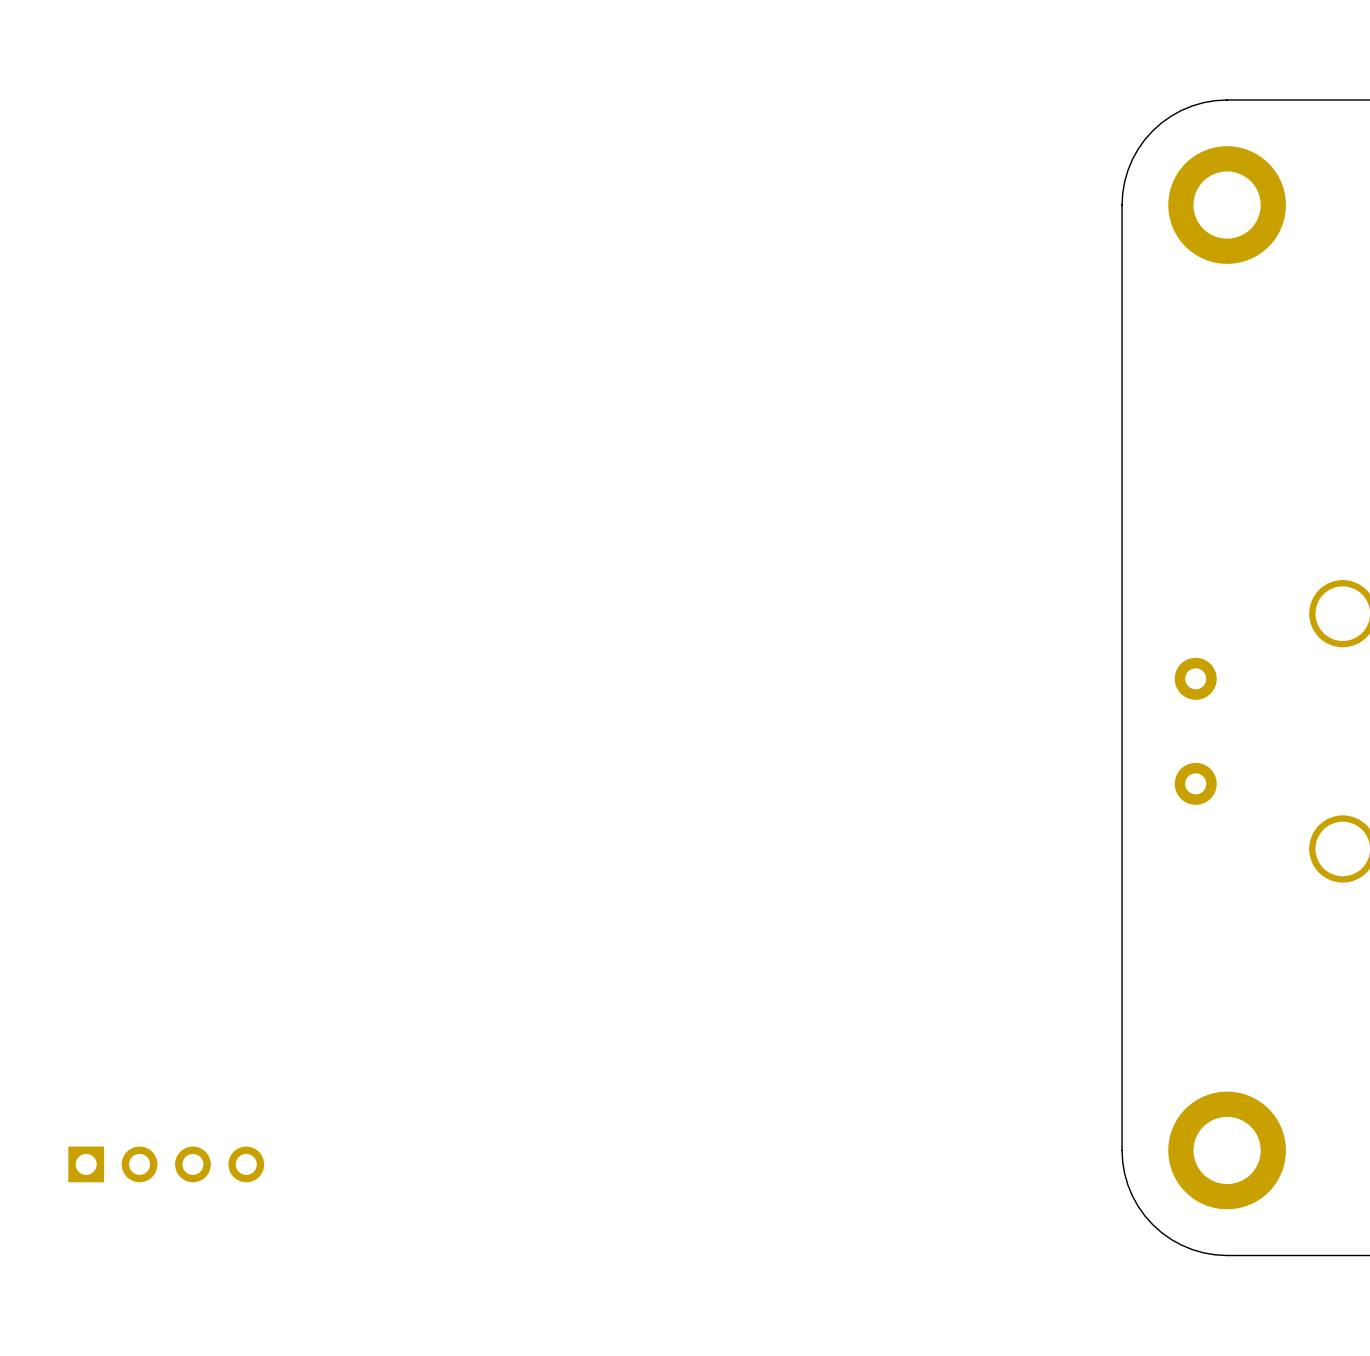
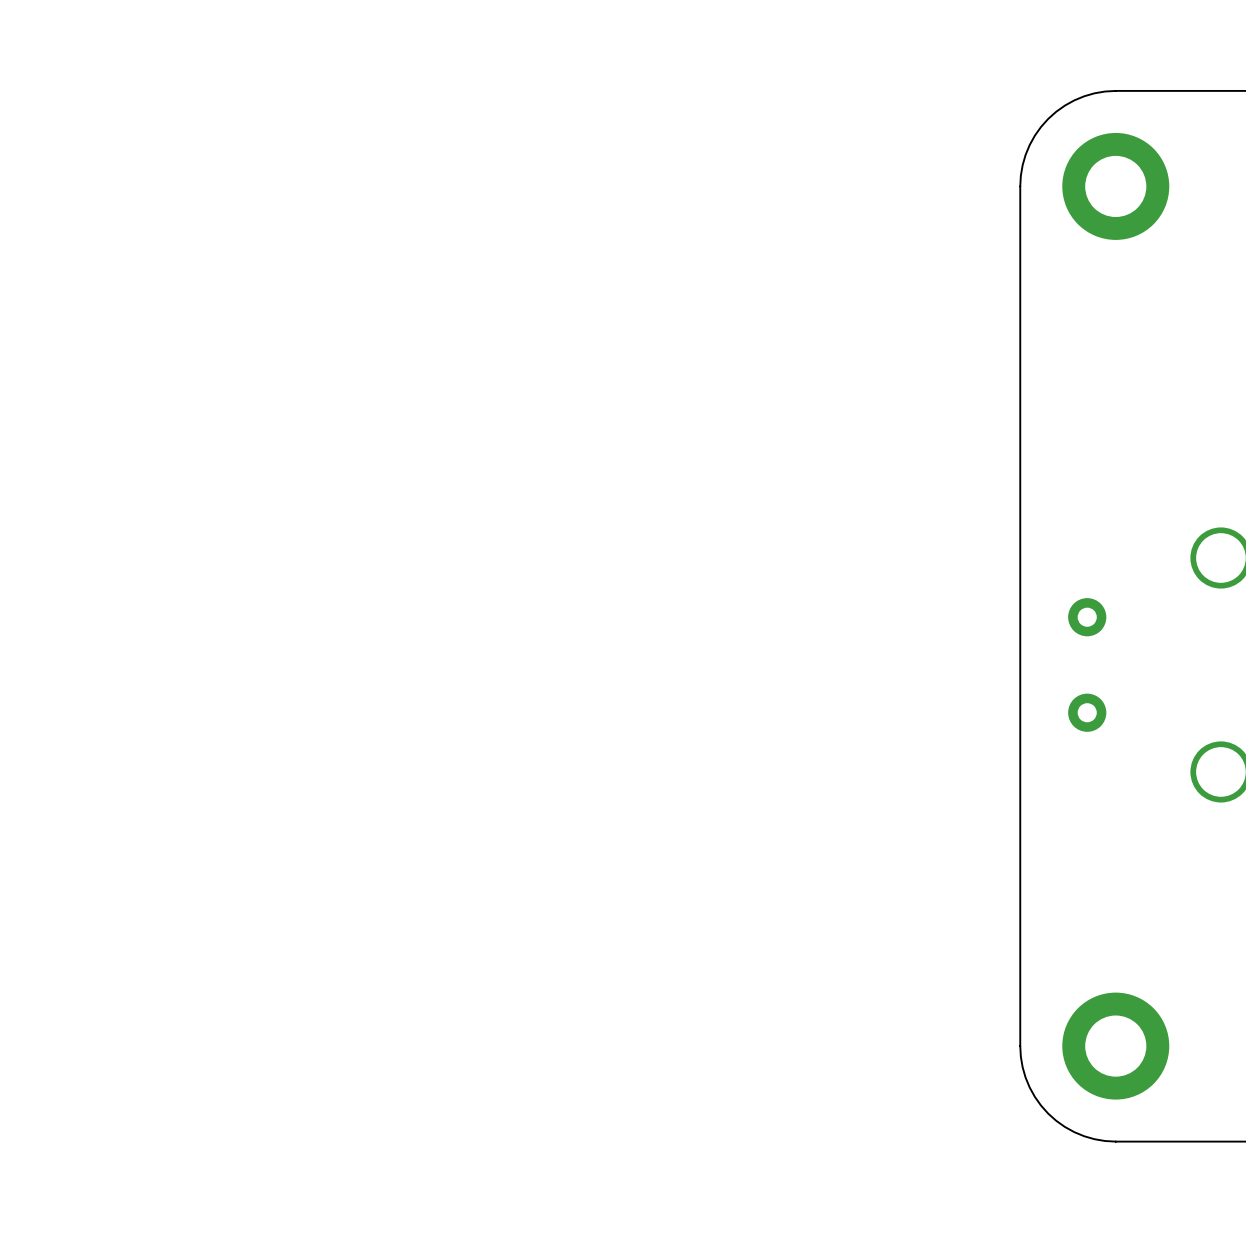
part: (166, 1164) -> none

